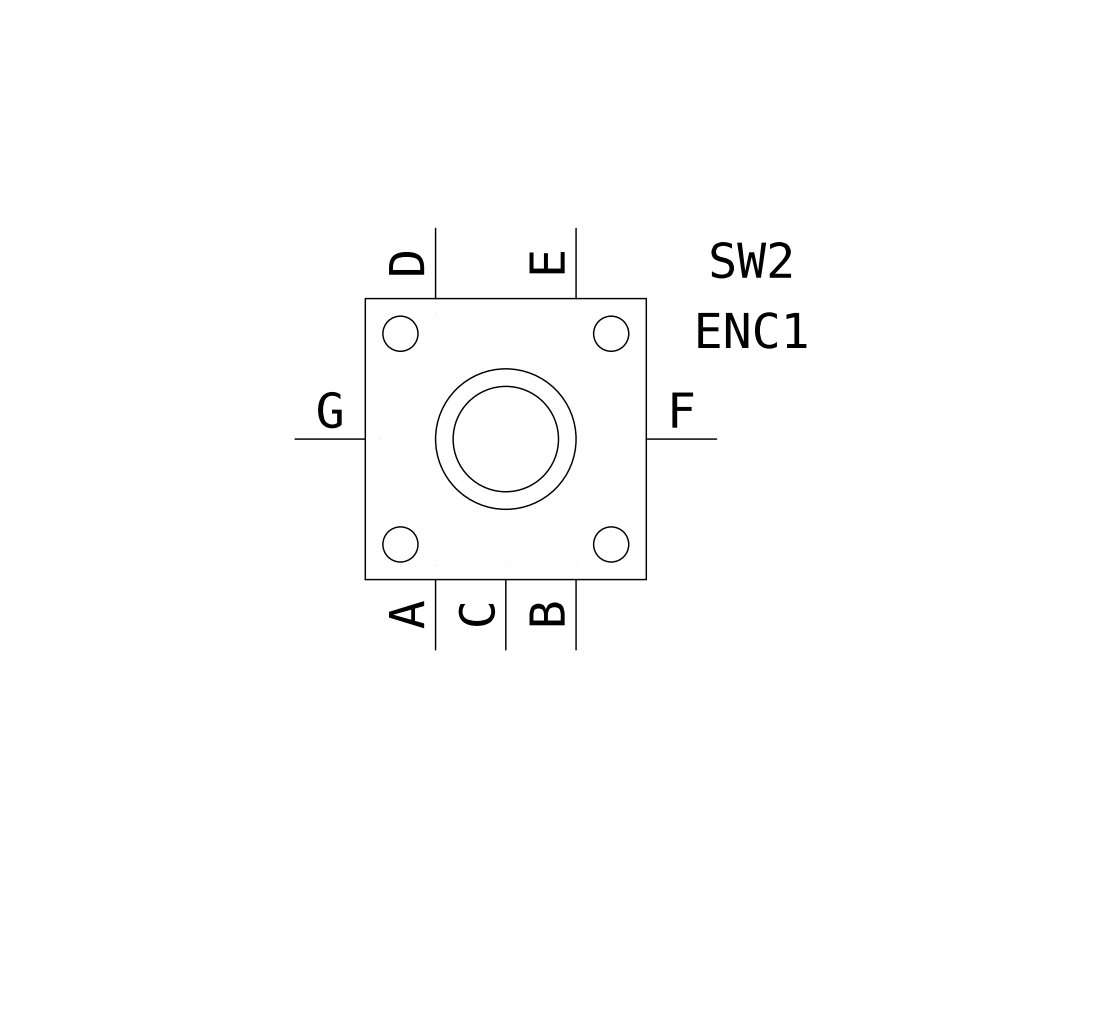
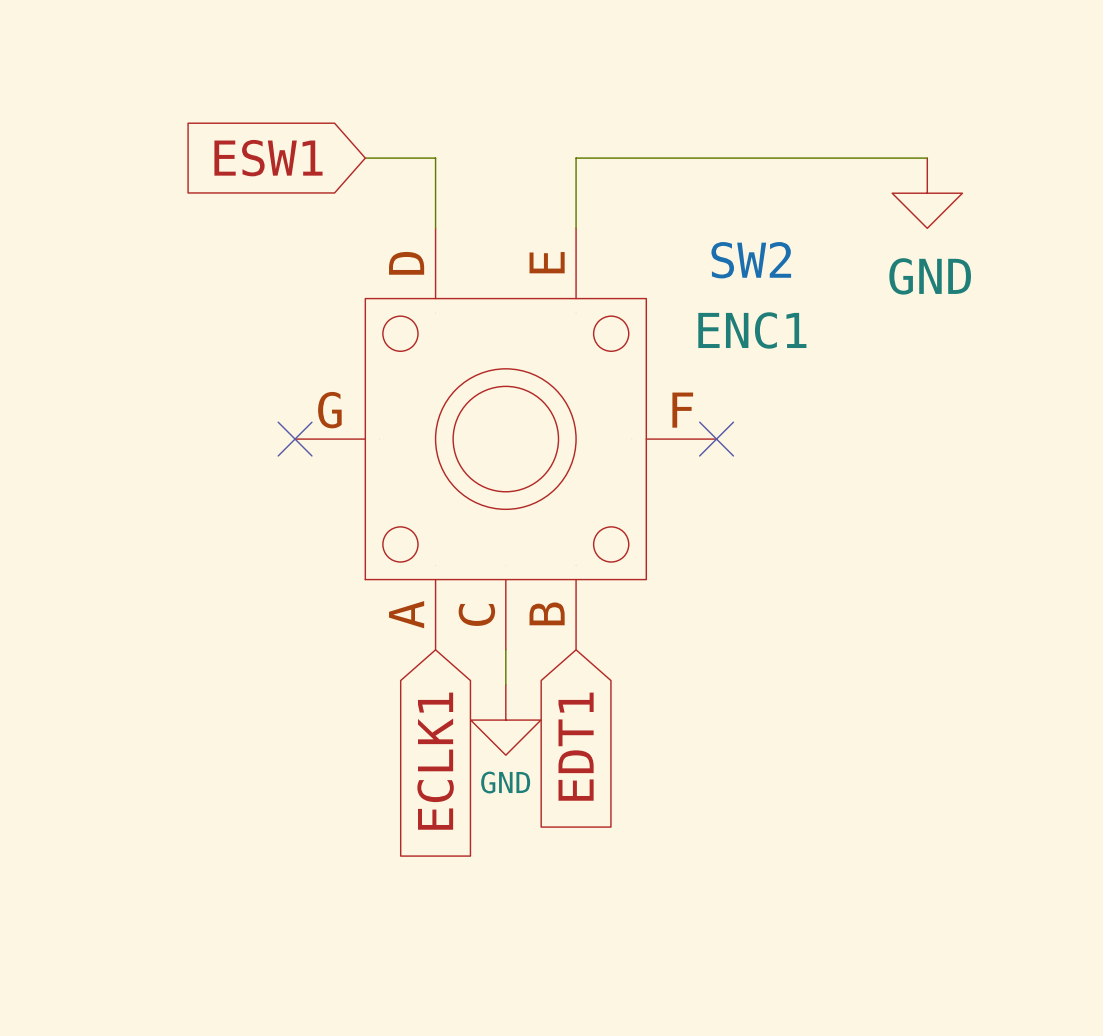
global label: none -> ESW1 (268, 158)
wire: none -> (365, 158) (435, 158) (435, 228)
wire: none -> (927, 158) (576, 158) (576, 228)
power symbol: none -> GND (927, 193)
no-connect mark: none -> (295, 439)
no-connect mark: none -> (716, 439)
wire: none -> (505, 649) (505, 684)
power symbol: none -> GND (505, 720)
global label: none -> EDT1 (576, 746)
global label: none -> ECLK1 (435, 761)

